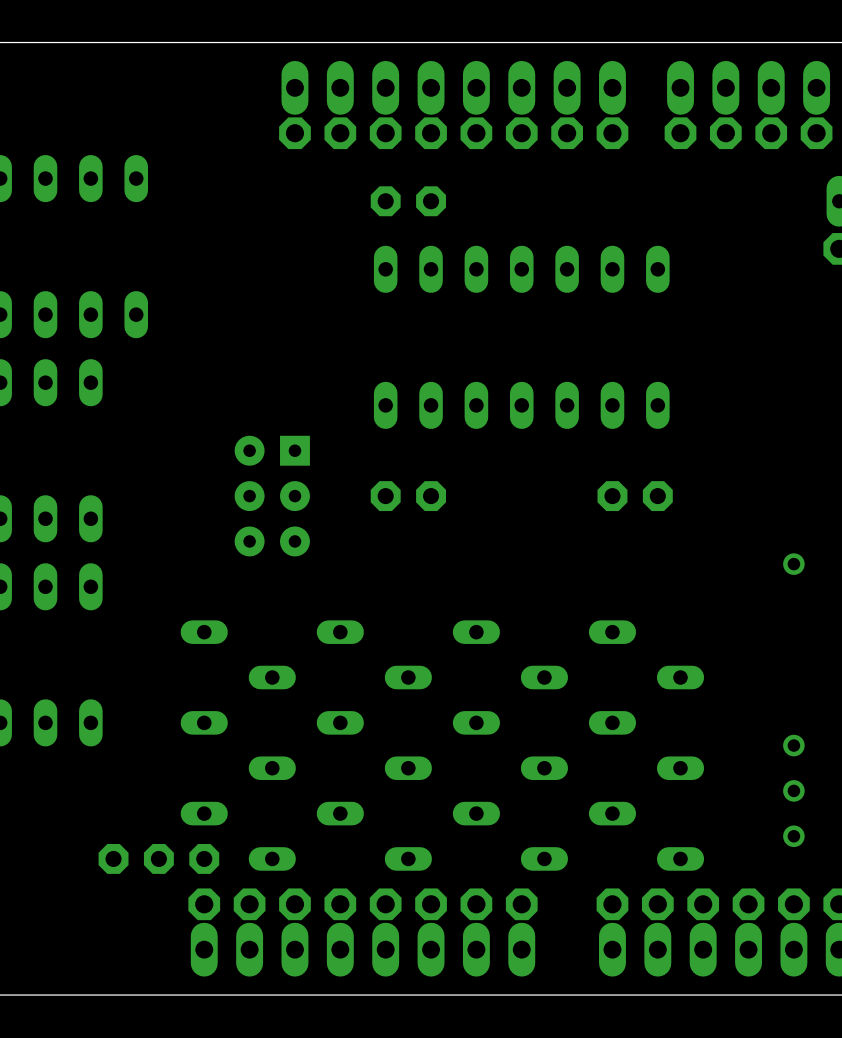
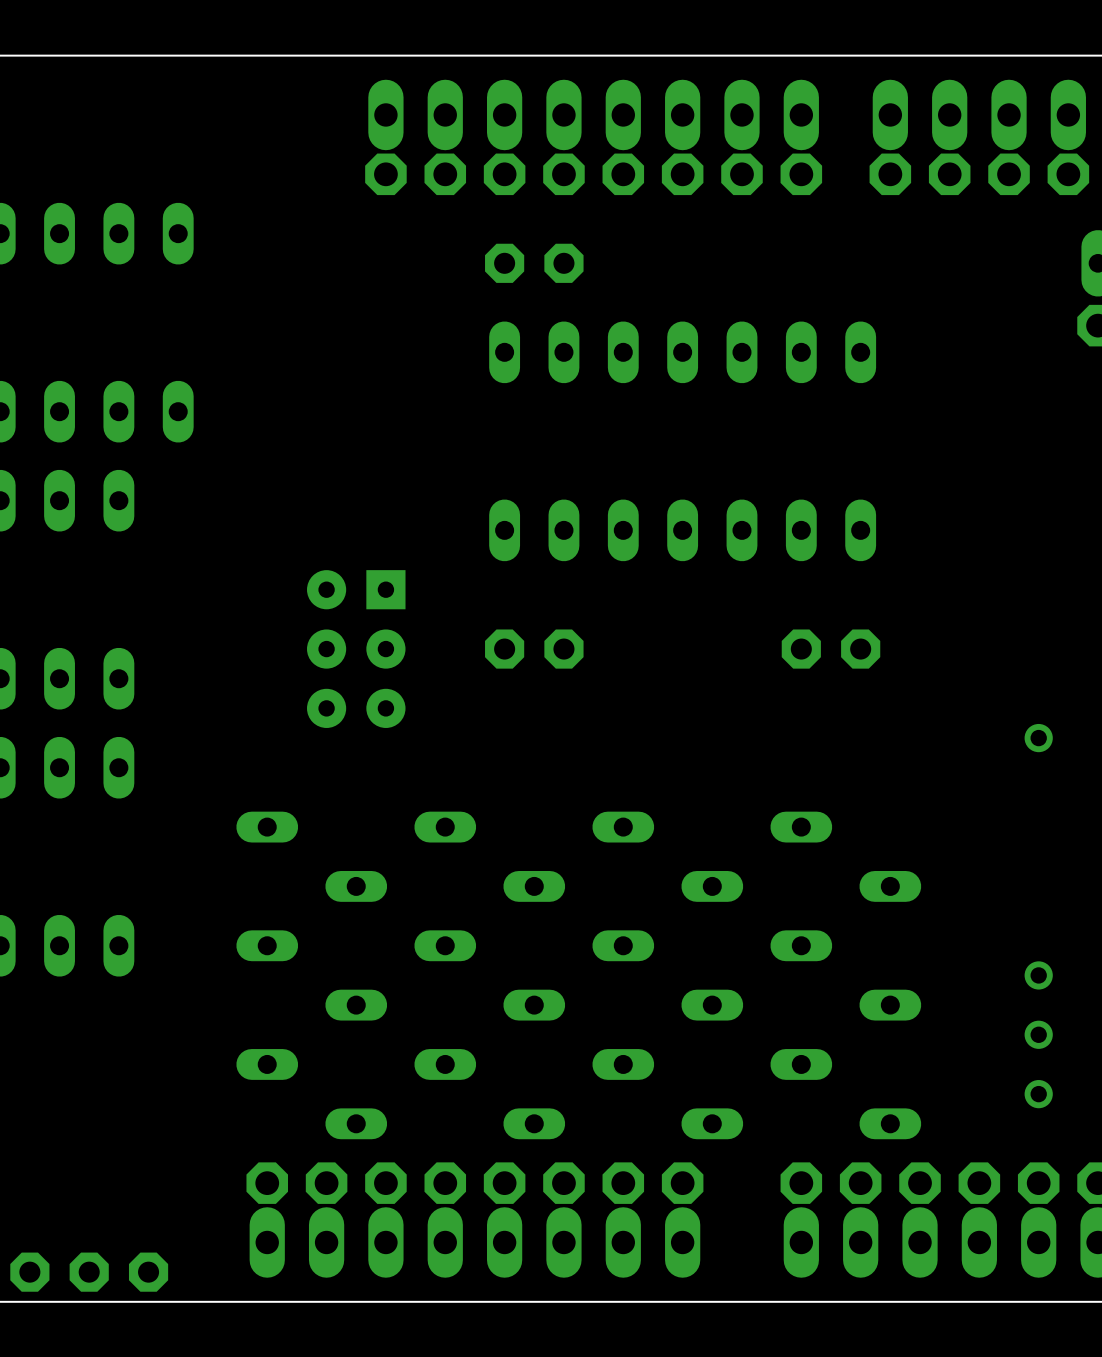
part position: (158, 858) -> (89, 1272)

